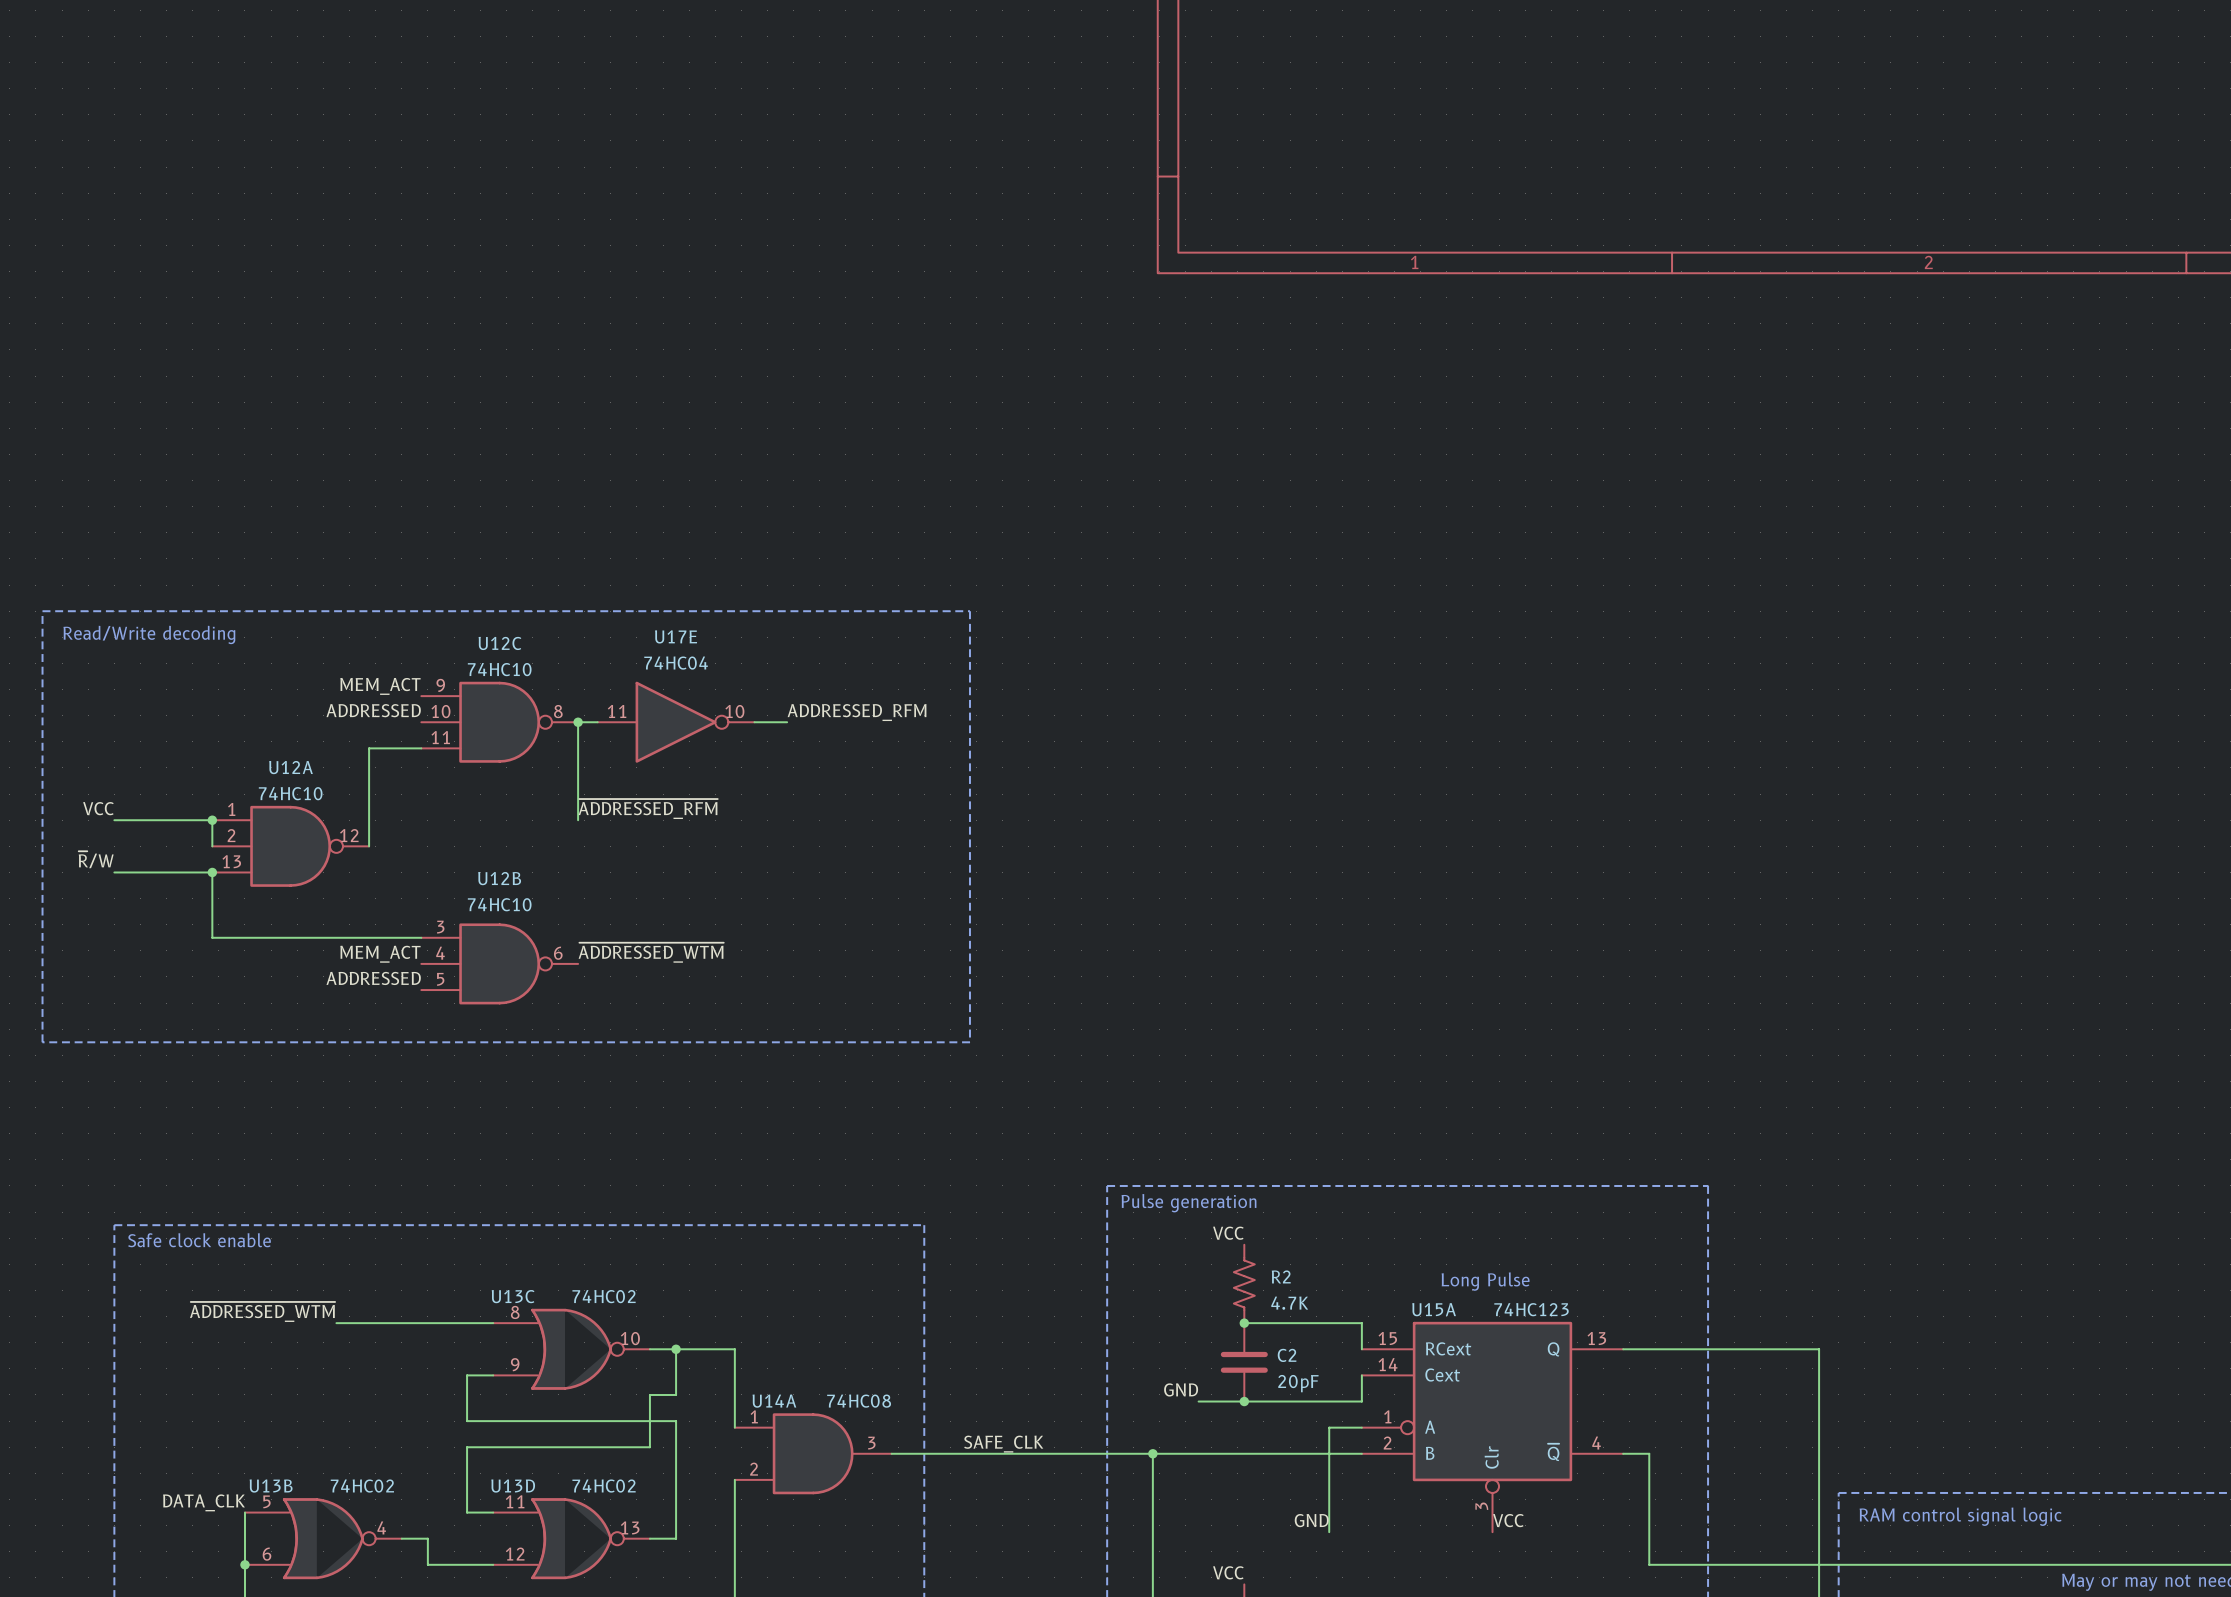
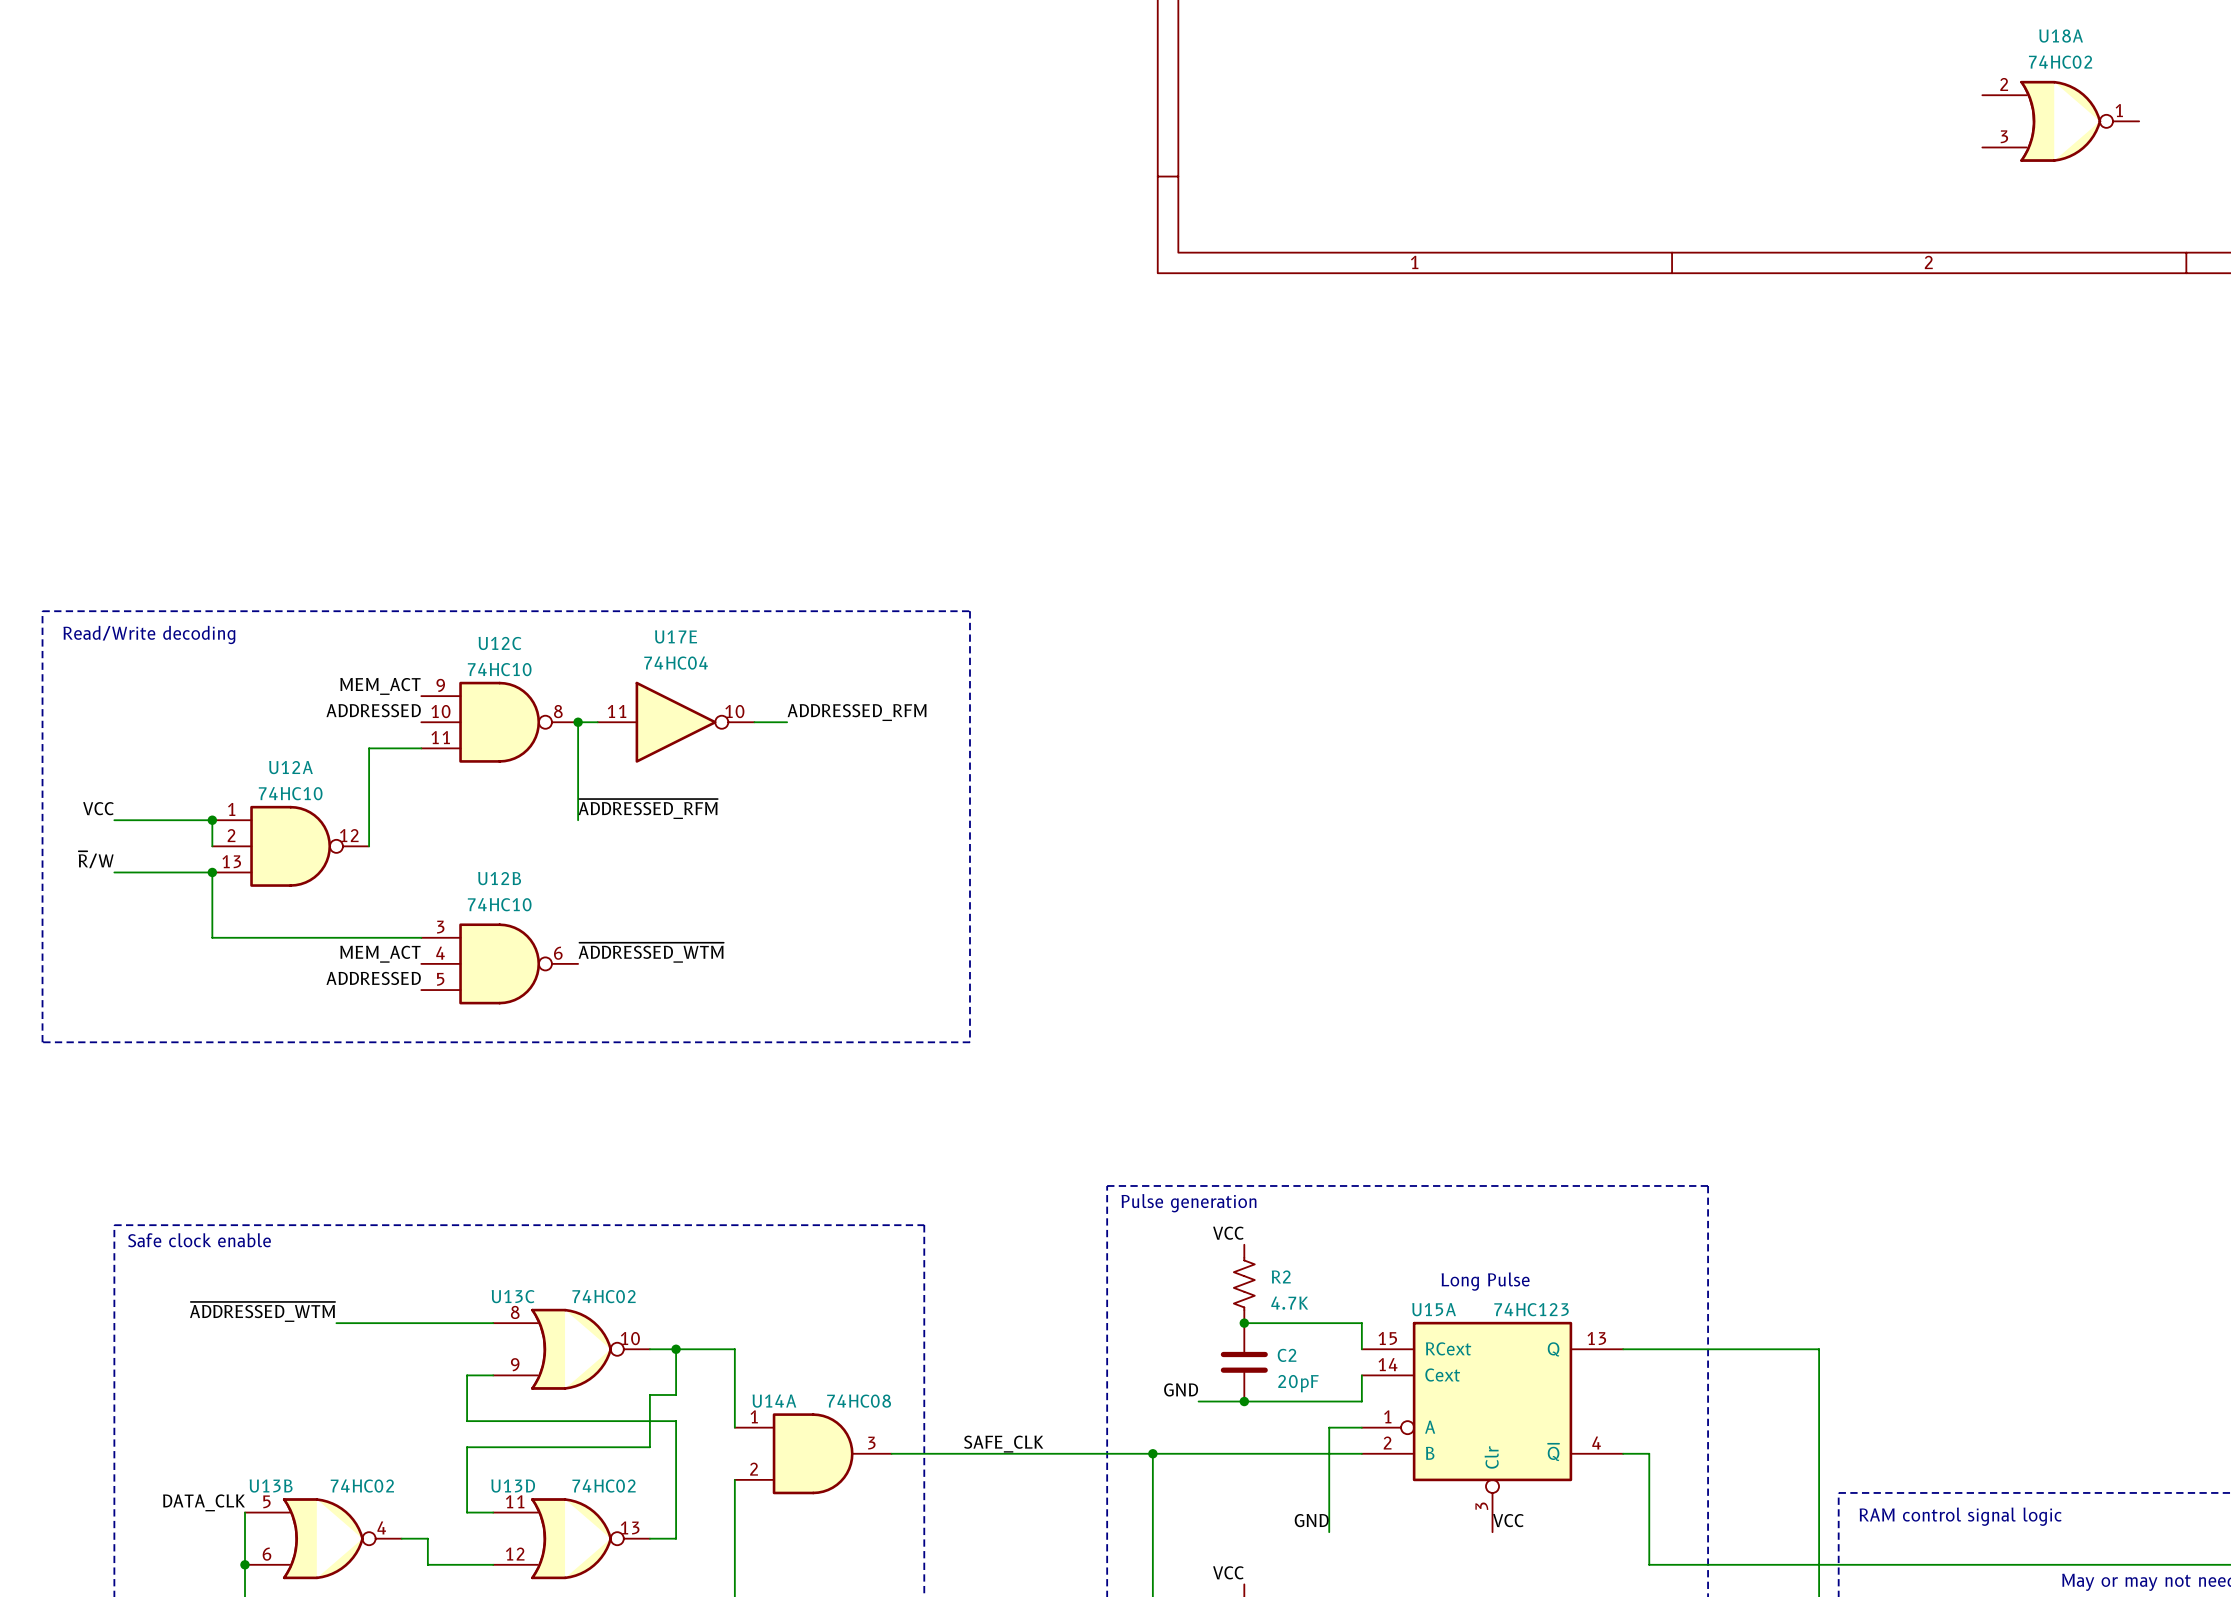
U18A: none -> 74HC02 (2060, 121)

